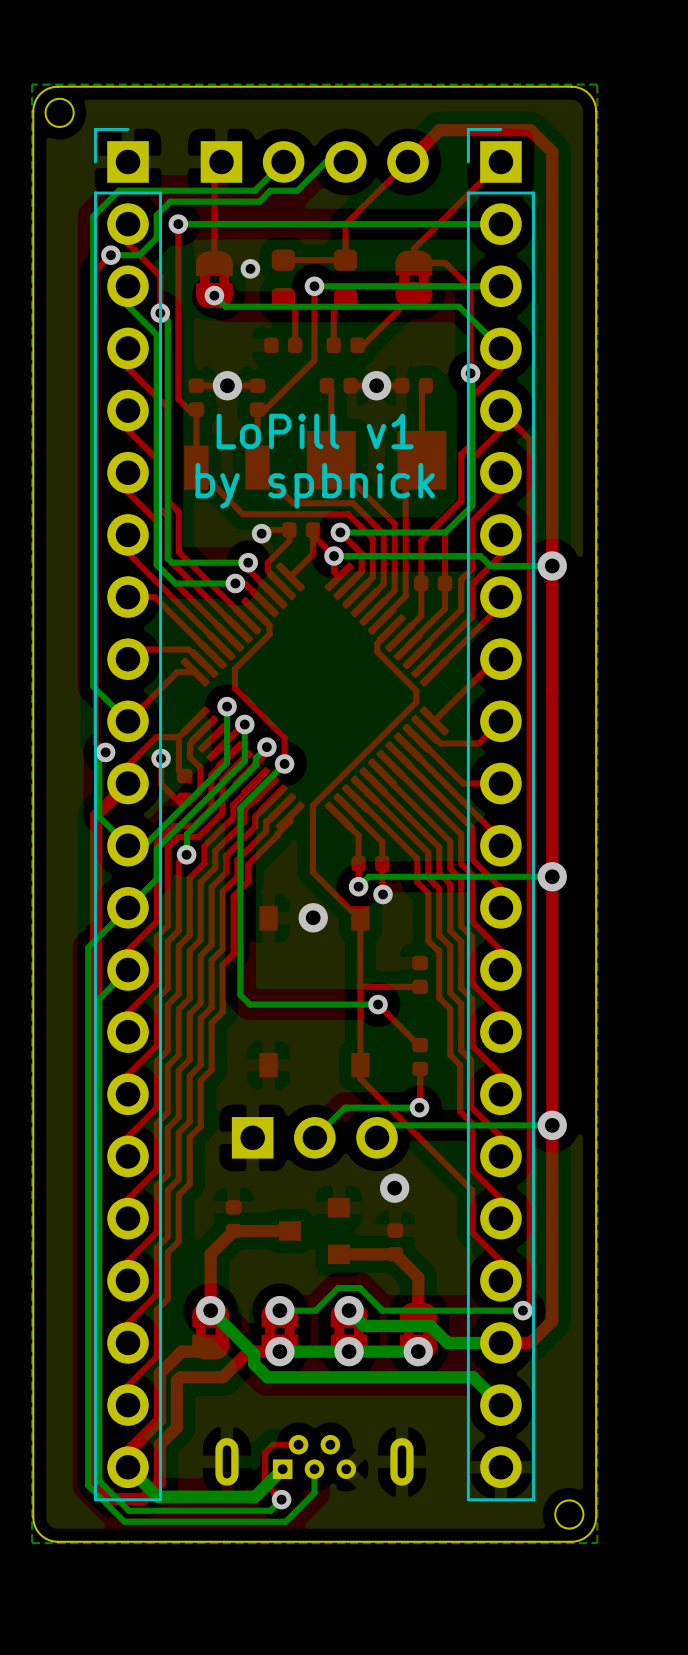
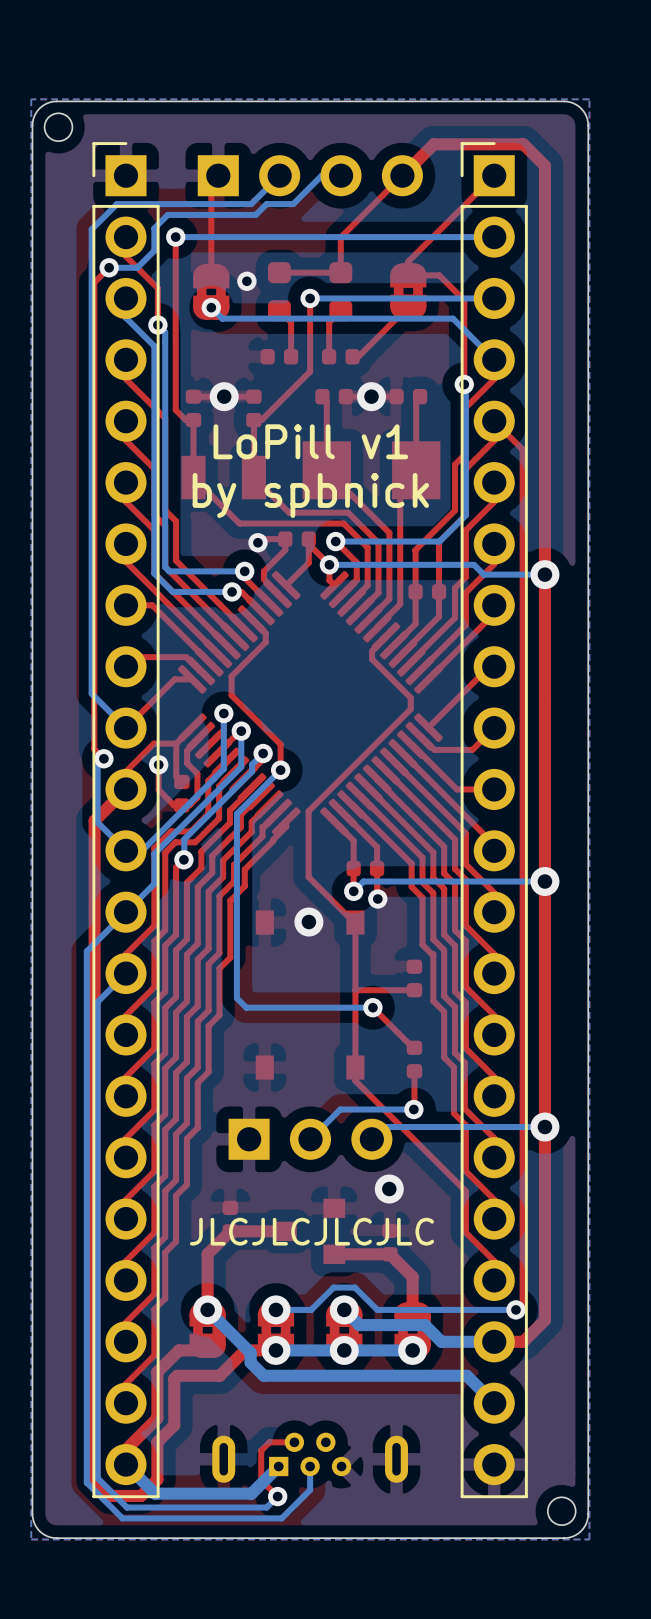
text: none -> JLCJLCJLCJLC (312, 1231)

